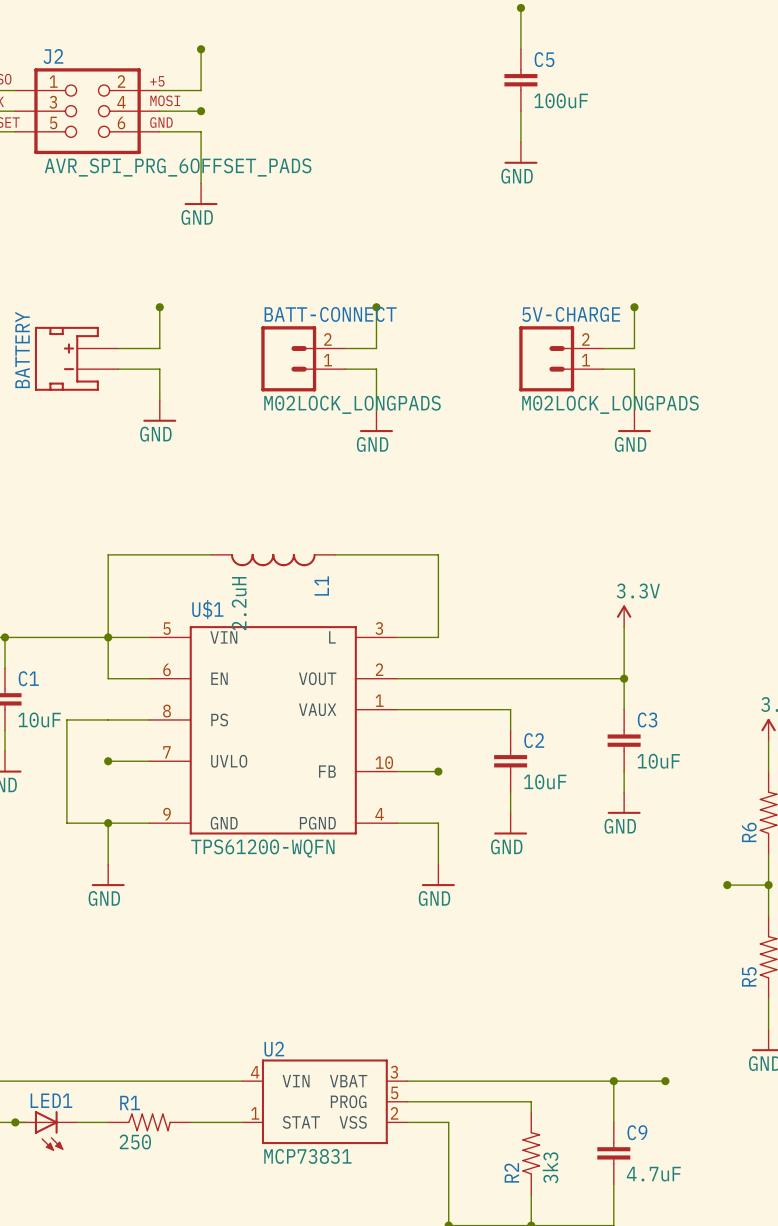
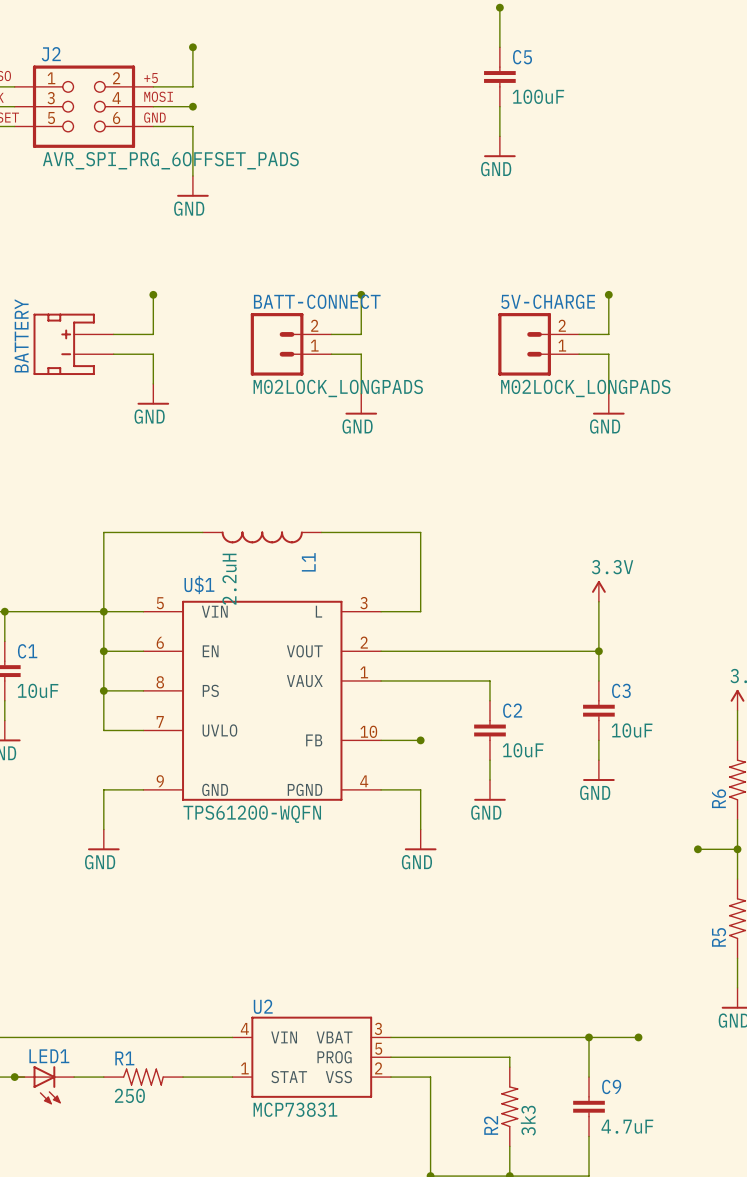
wire: none -> (103, 651) (103, 730)
junction: none -> (103, 651)
wire: (108, 719) (66, 719) (66, 823) (108, 823) -> none
junction: none -> (103, 690)
junction: (108, 761) -> none
junction: (108, 823) -> none

